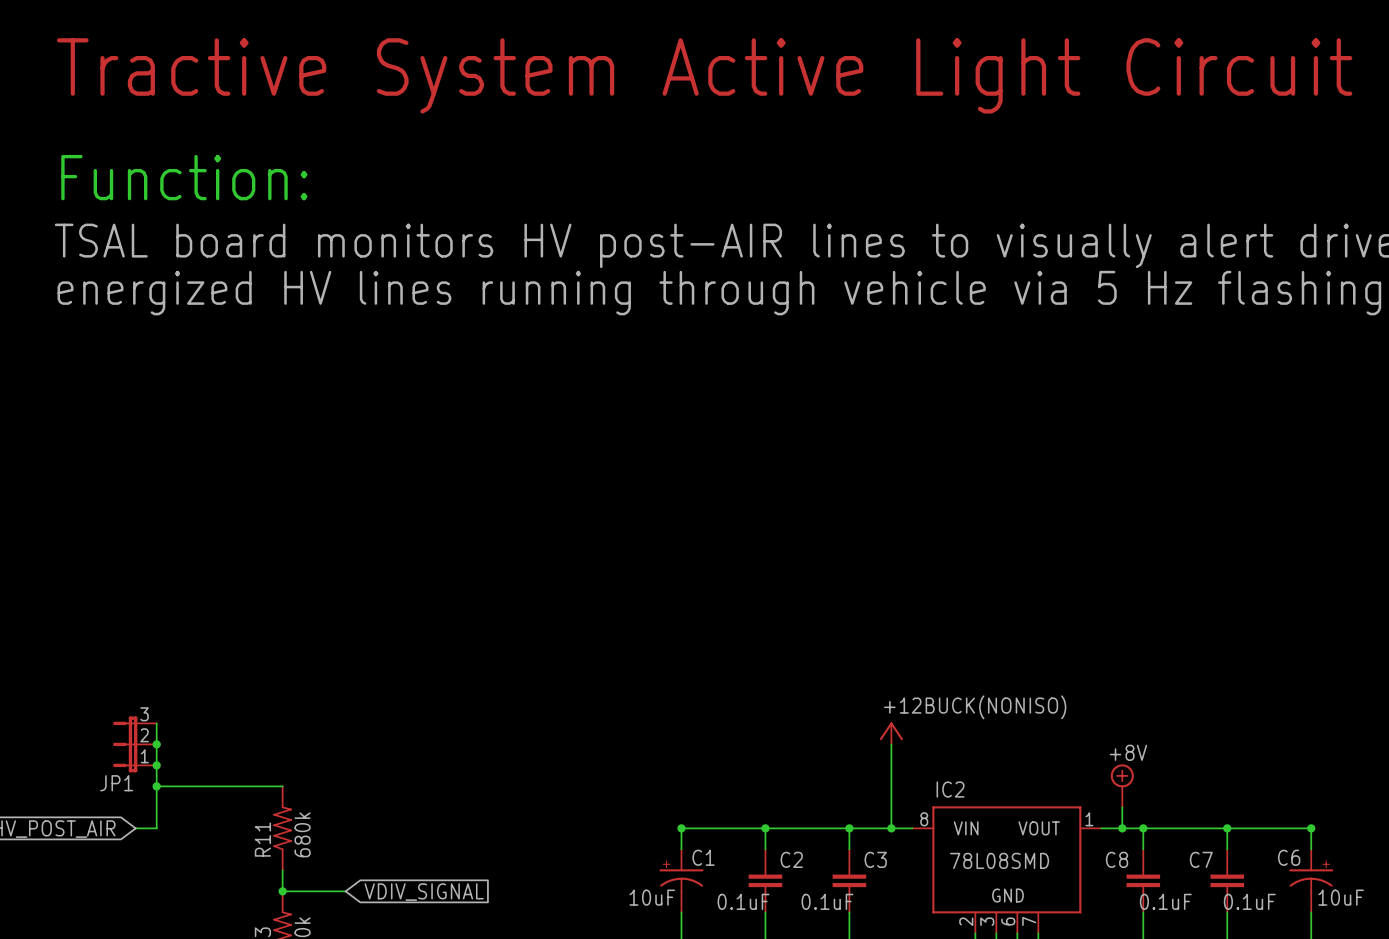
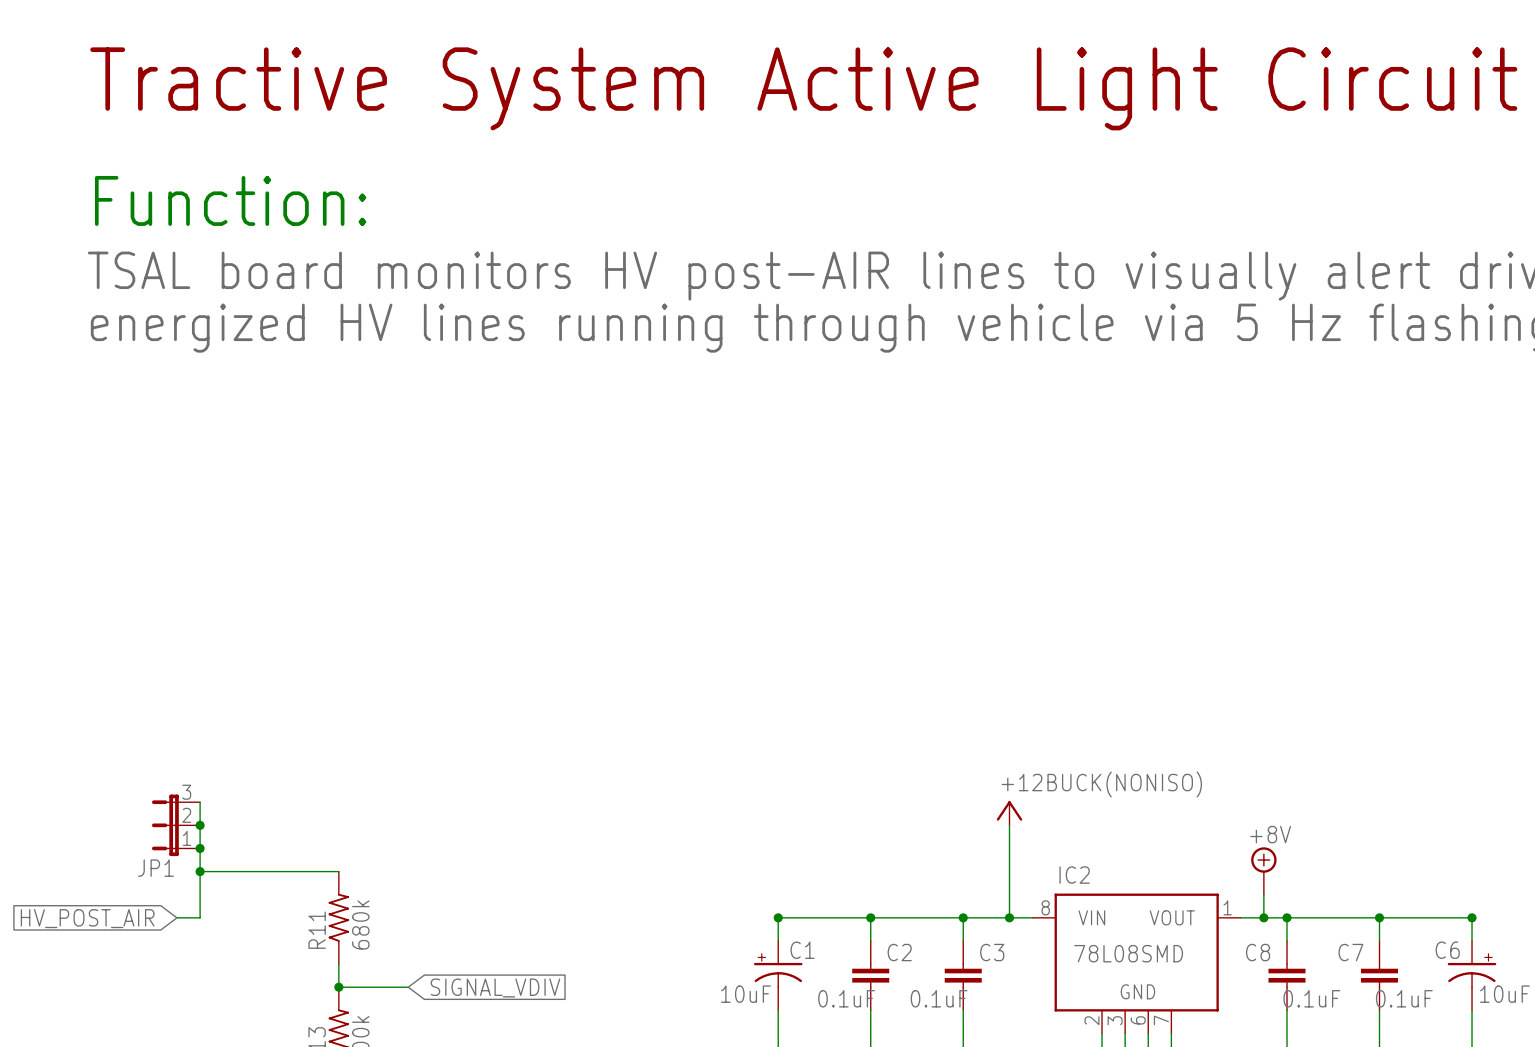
global label: VDIV_SIGNAL (424, 892) -> SIGNAL_VDIV (495, 987)

